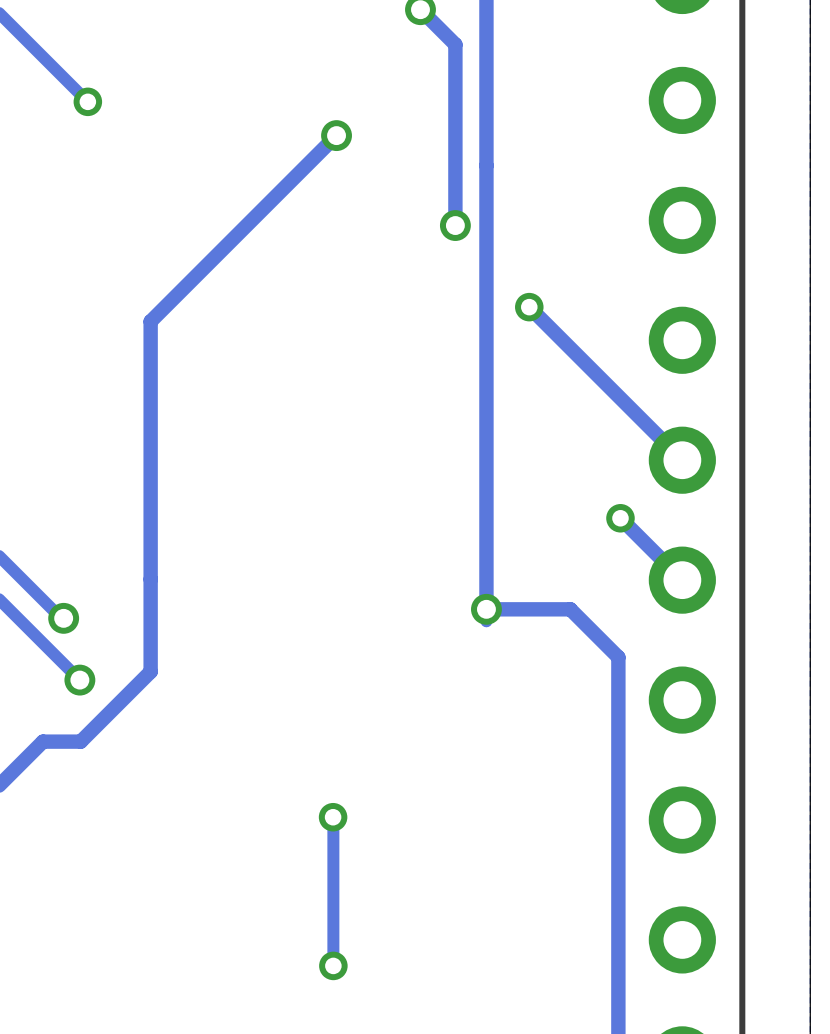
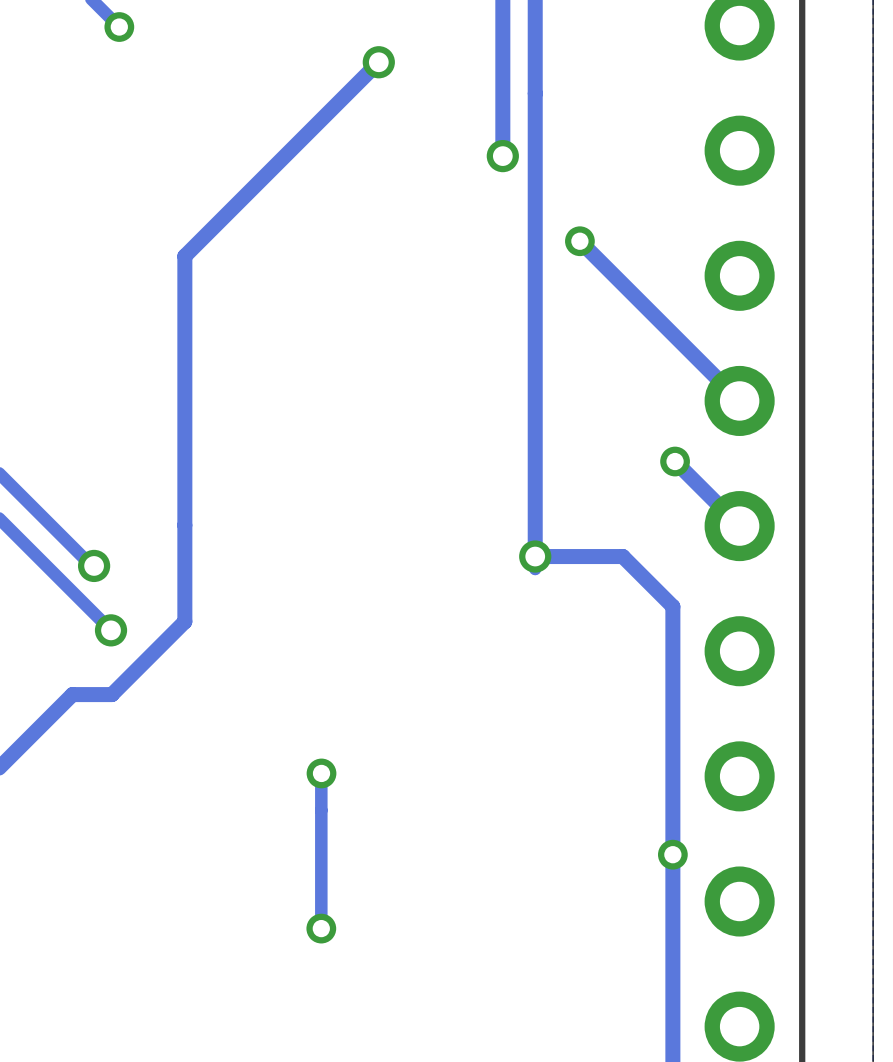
track: (333, 817) (333, 965) -> (321, 773) (321, 928)
via position: (333, 817) -> (321, 773)
via: none -> (672, 854)
via position: (333, 965) -> (321, 928)

